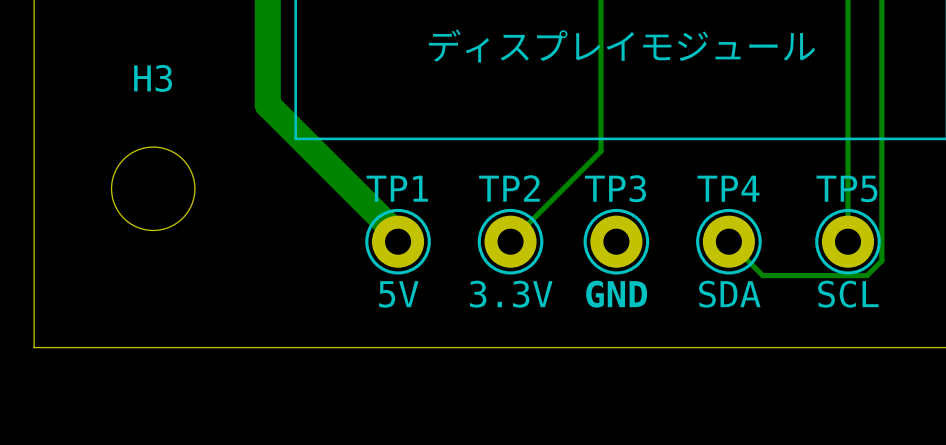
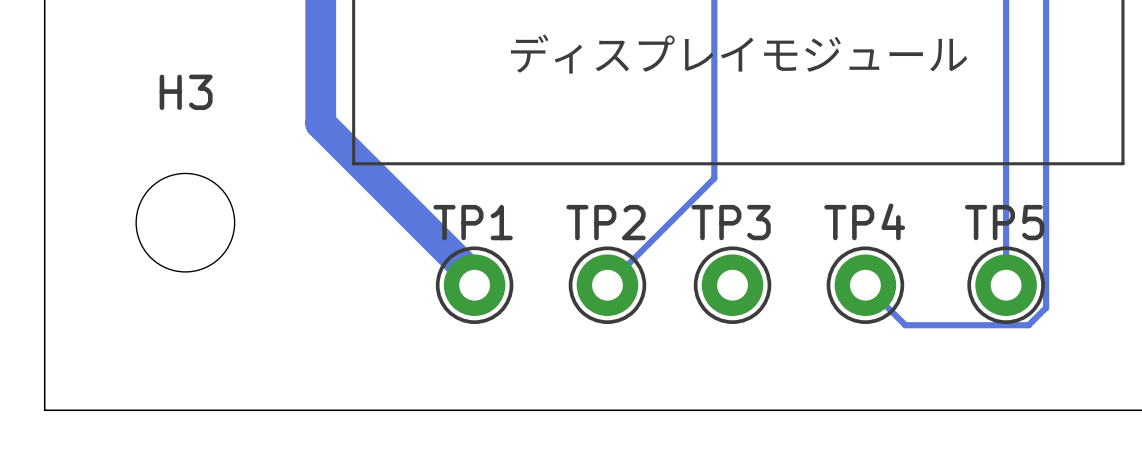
TP1 value: 5V (398, 294) -> none
TP2 value: 3.3V (511, 294) -> none
TP3 value: GND (616, 294) -> none
TP4 value: SDA (729, 294) -> none
TP5 value: SCL (848, 294) -> none

